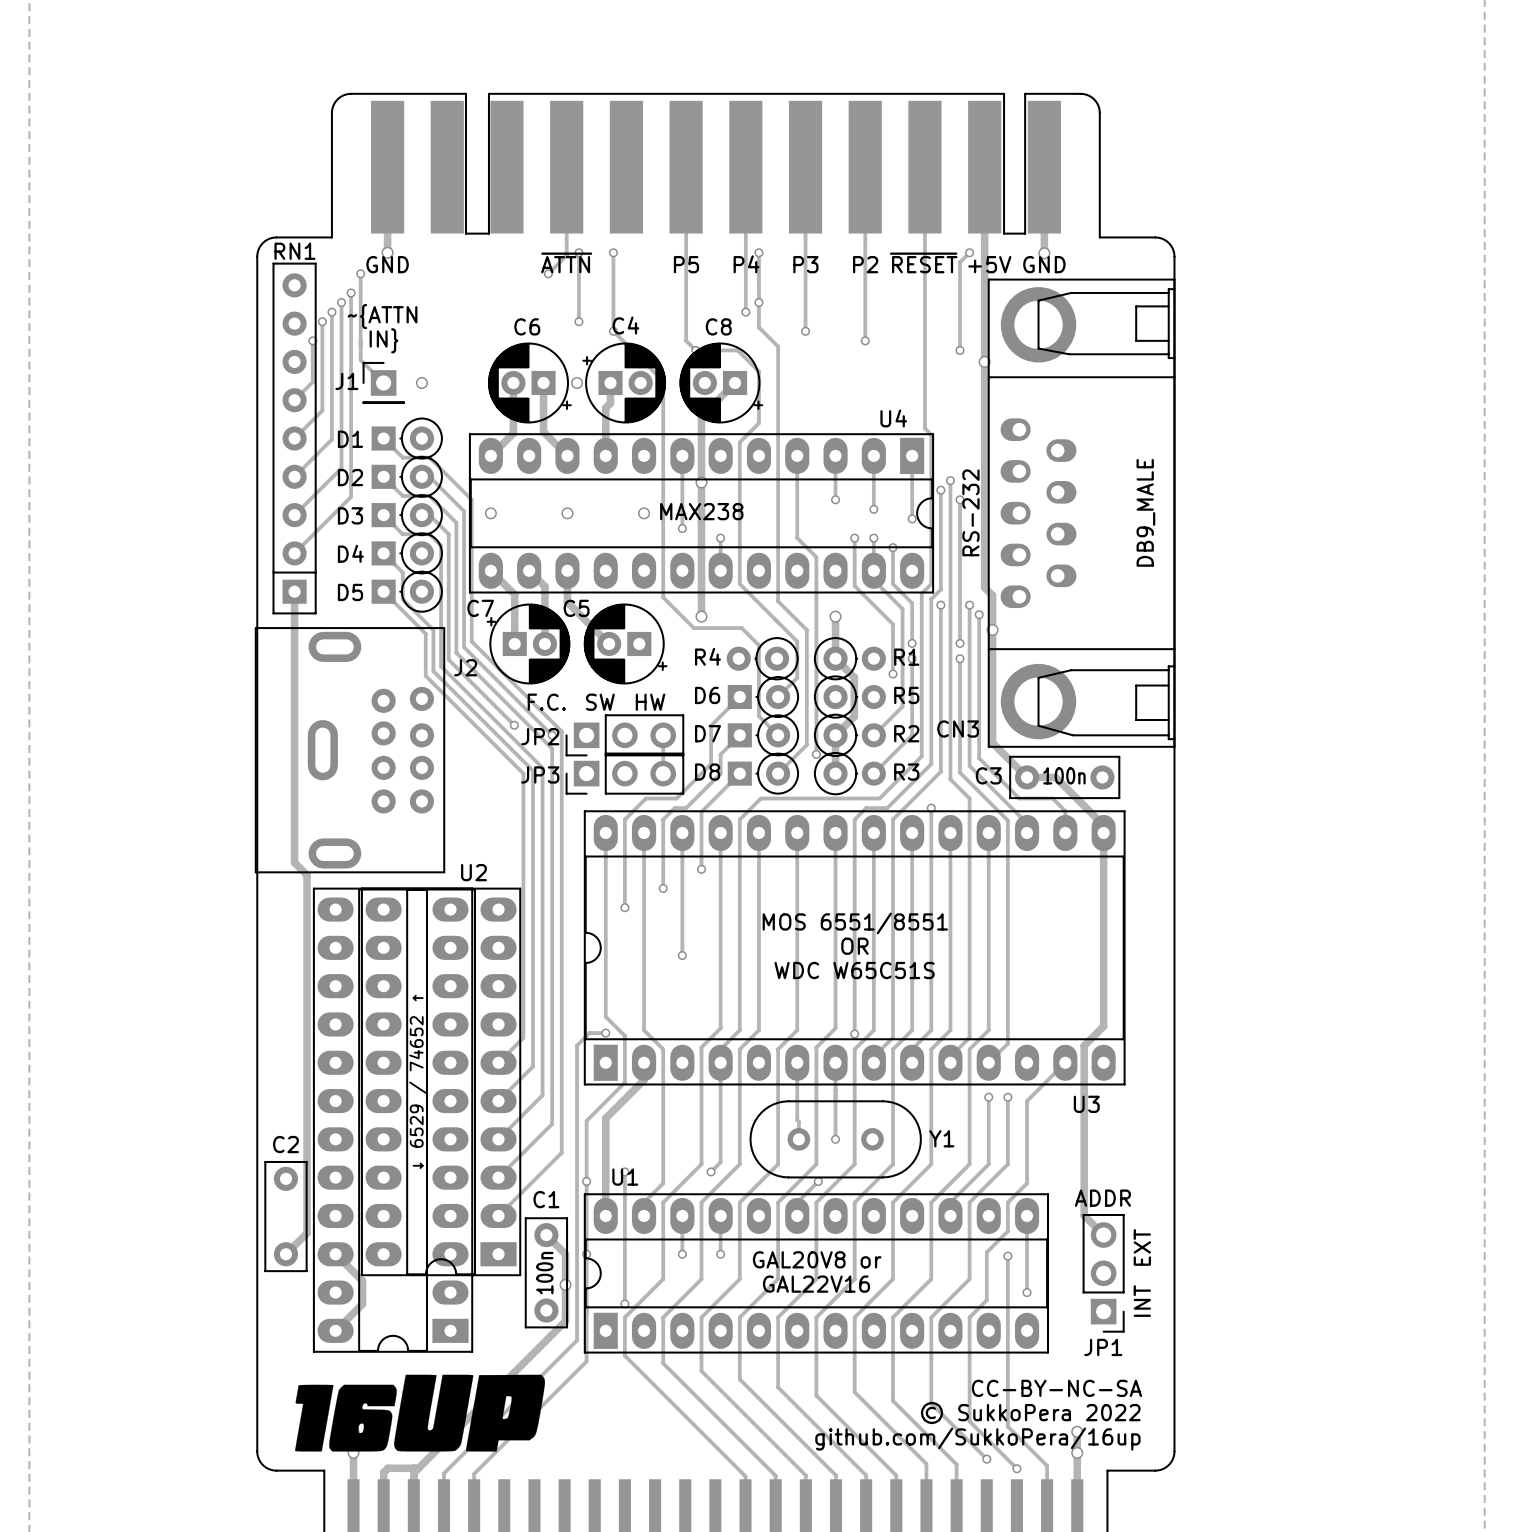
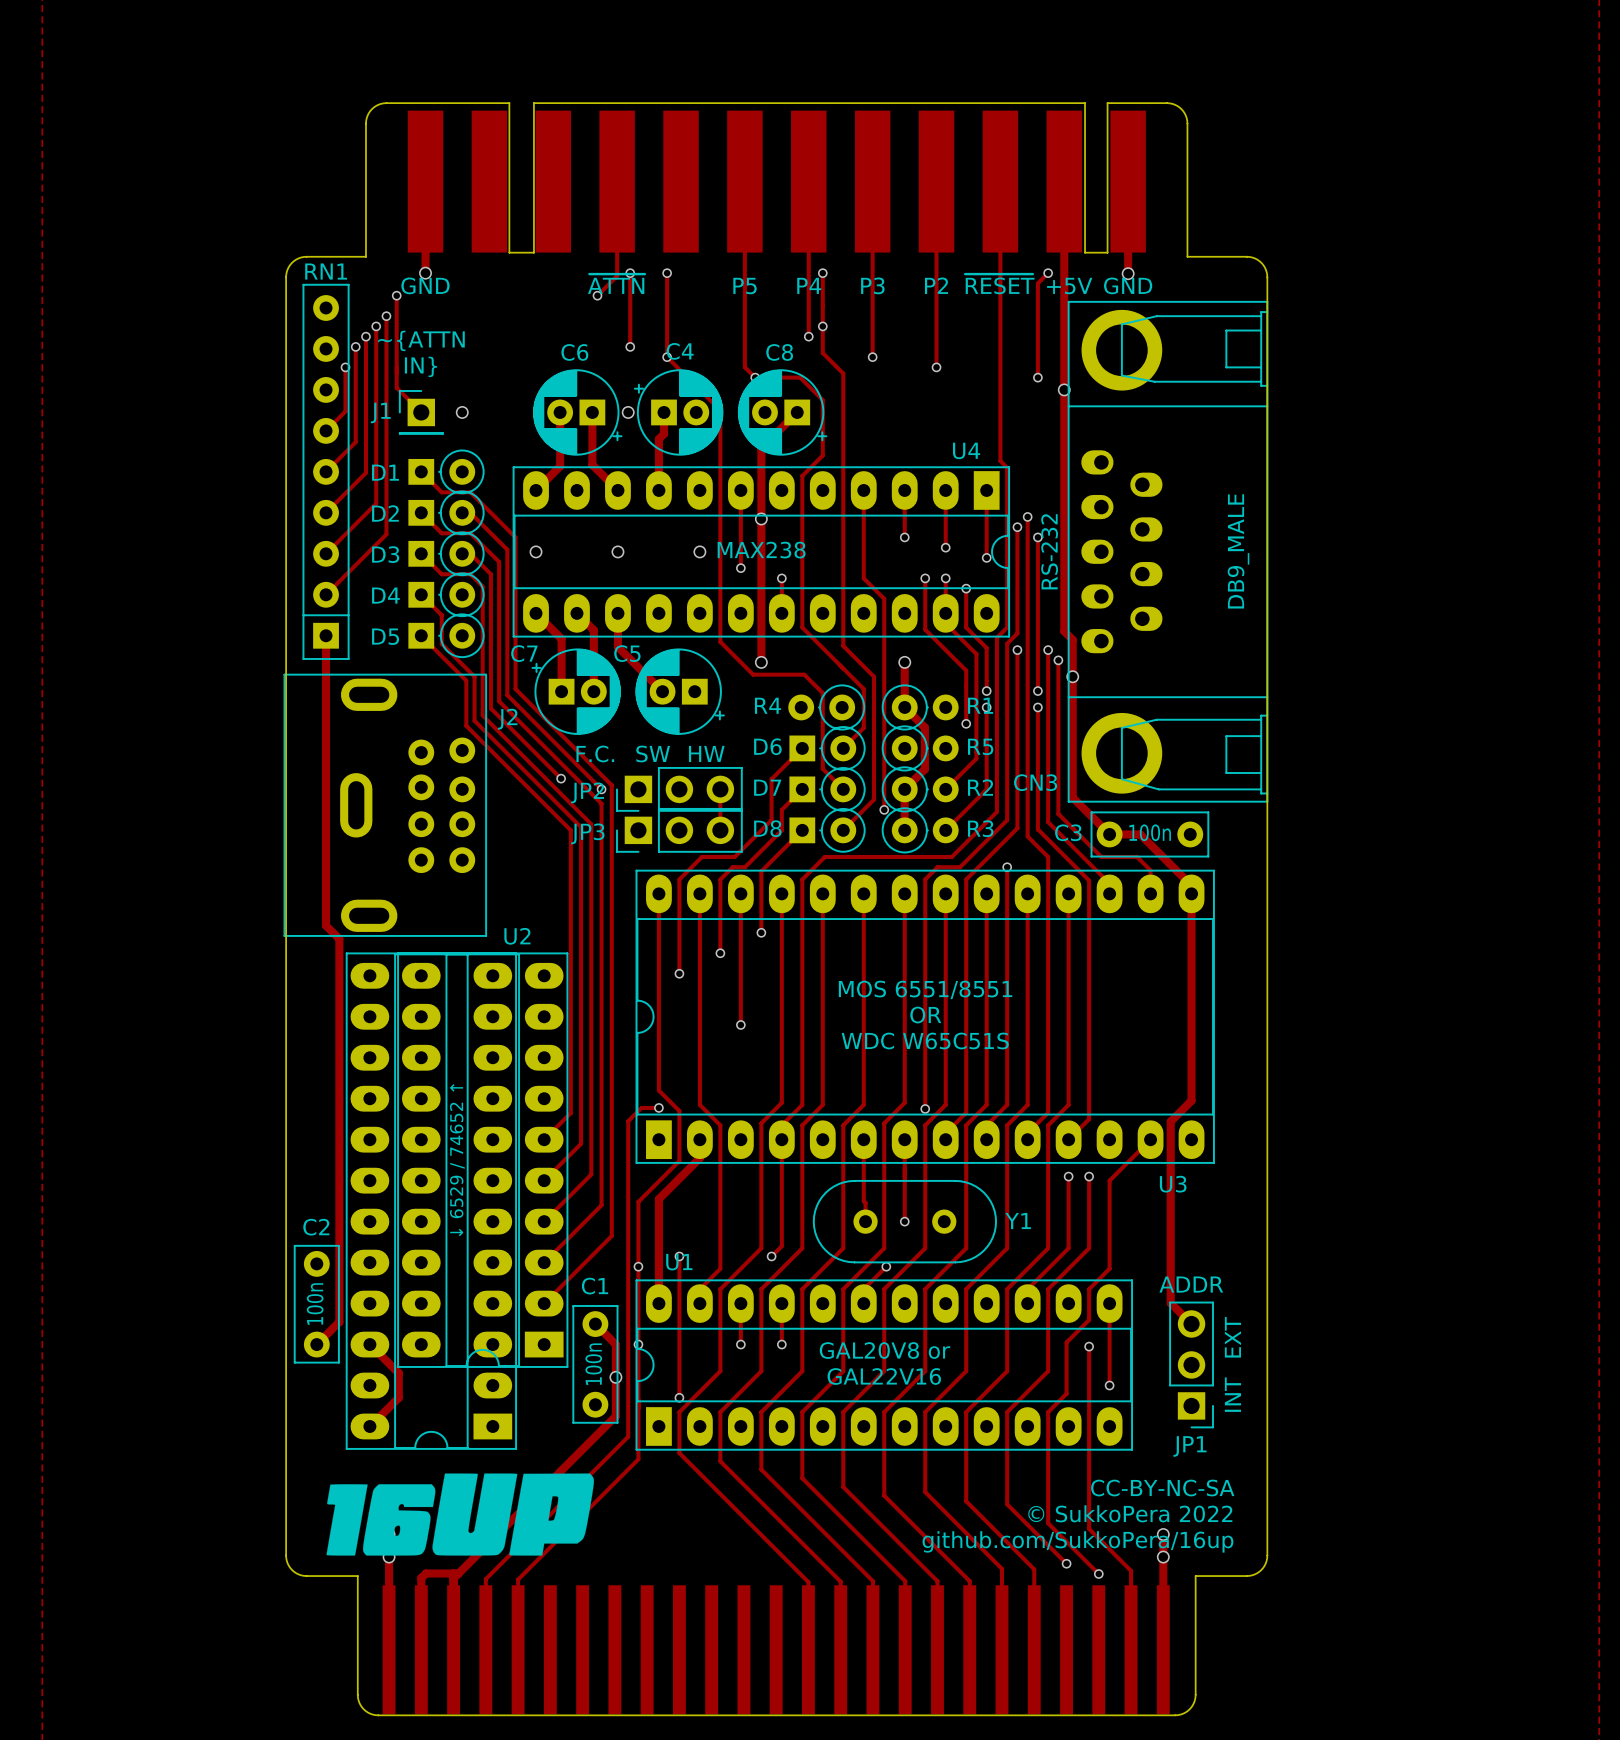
C2 value: none -> 100n (315, 1304)

